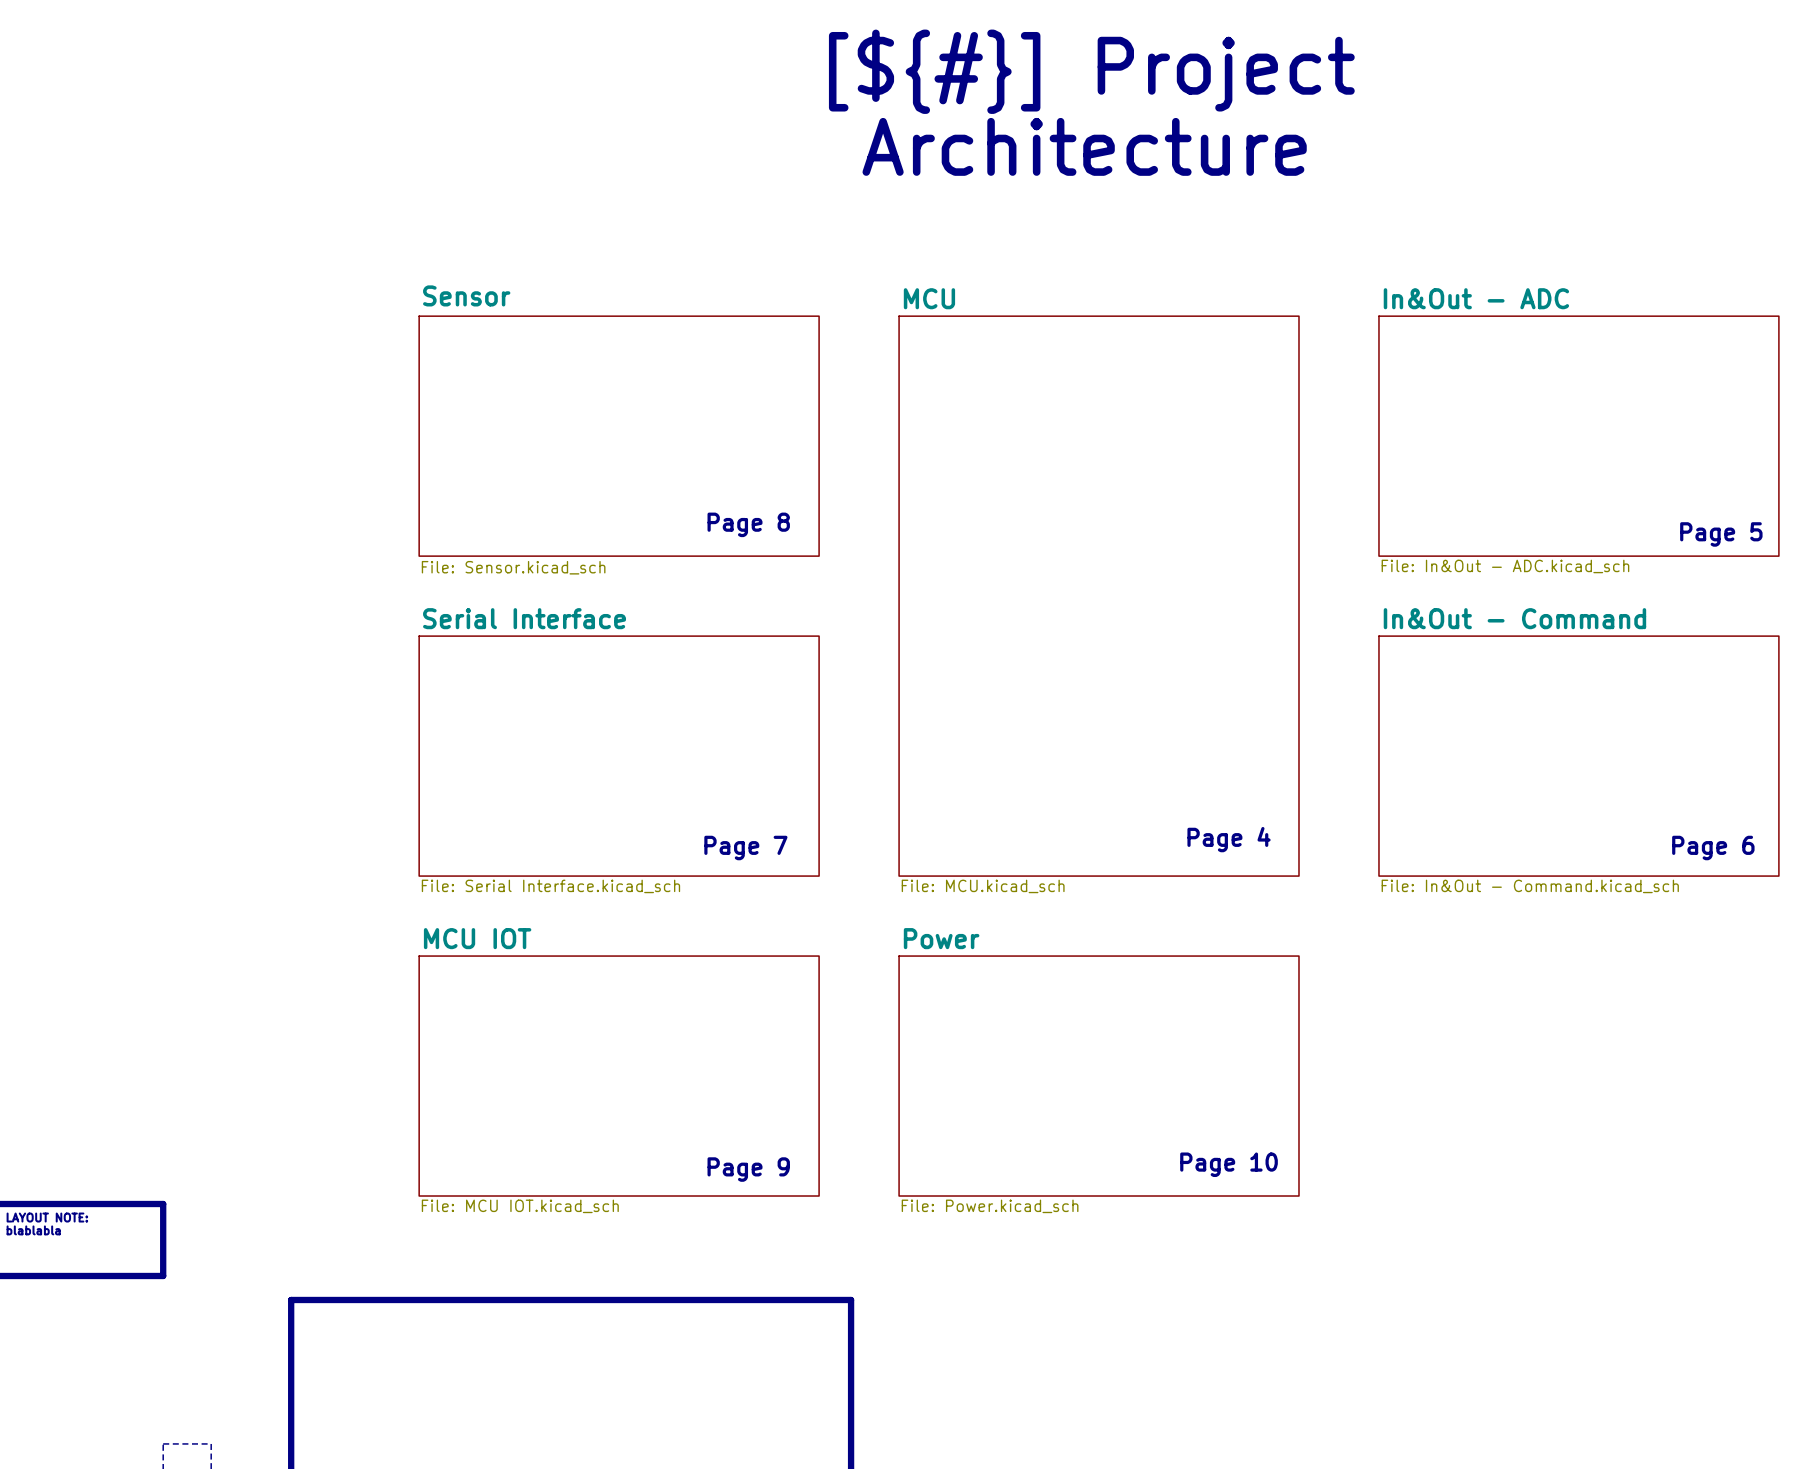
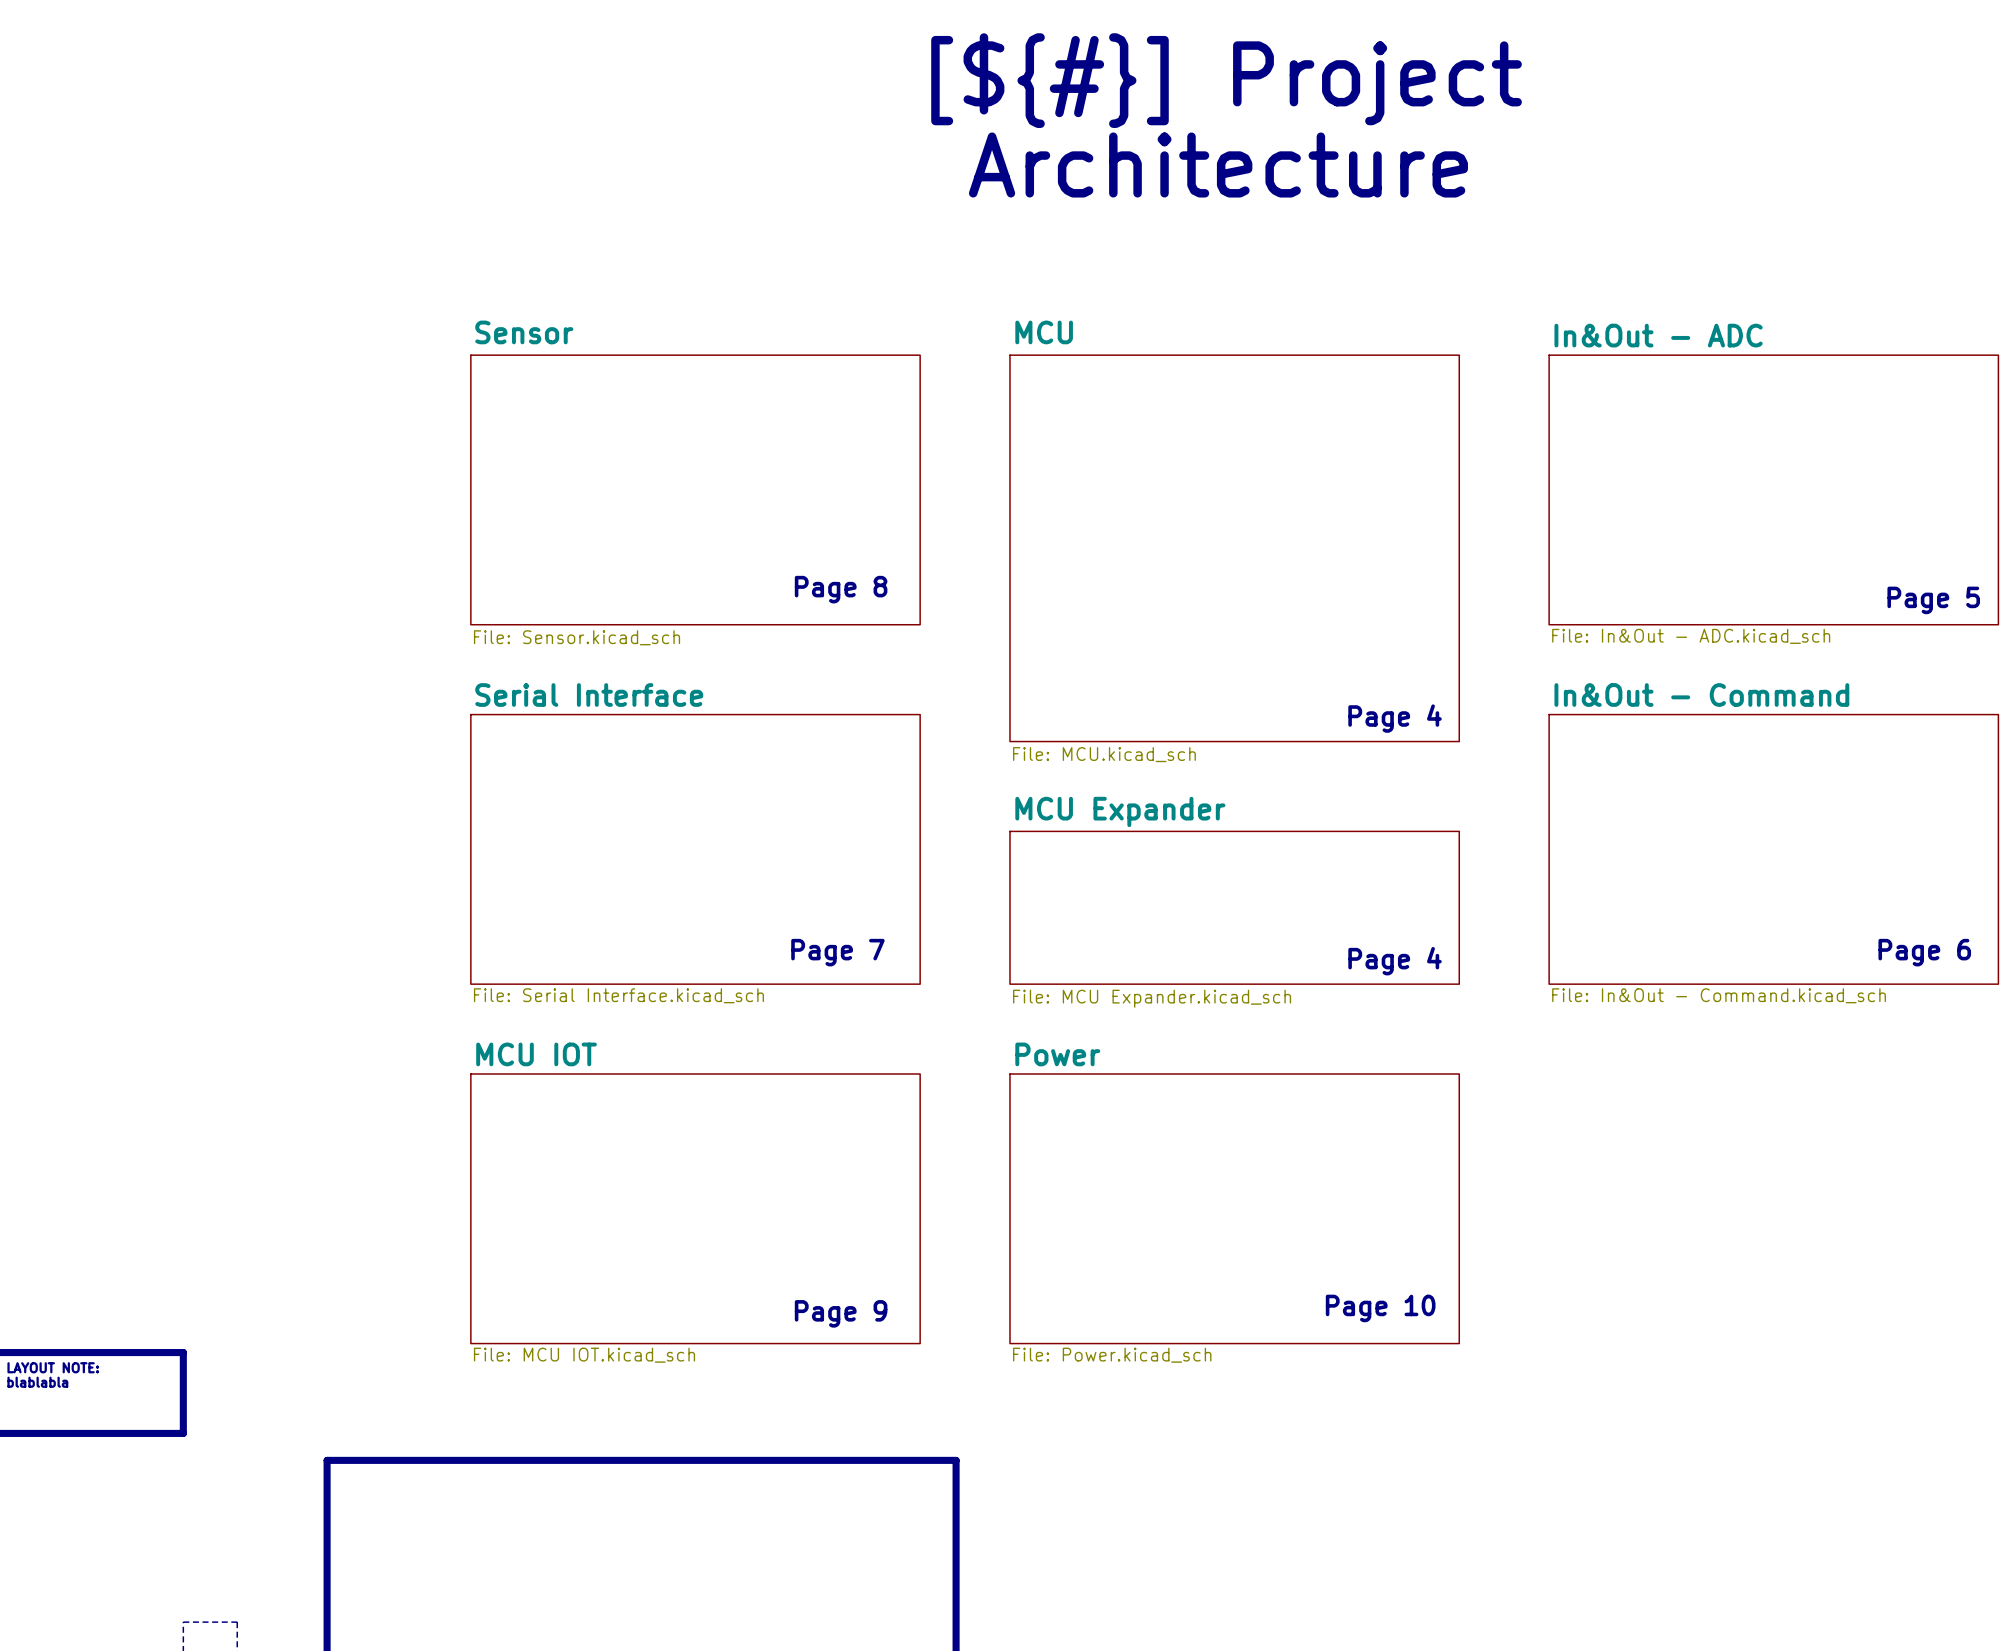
sheet MCU: none -> File: MCU.kicad_sch (1234, 548)
sheet MCU: File: MCU.kicad_sch (1099, 596) -> none
text: none -> Page 4 (1395, 718)
sheet MCU Expander: none -> File: MCU Expander.kicad_sch (1234, 907)
text position: Page 4 (1229, 839) -> Page 4 (1395, 961)

